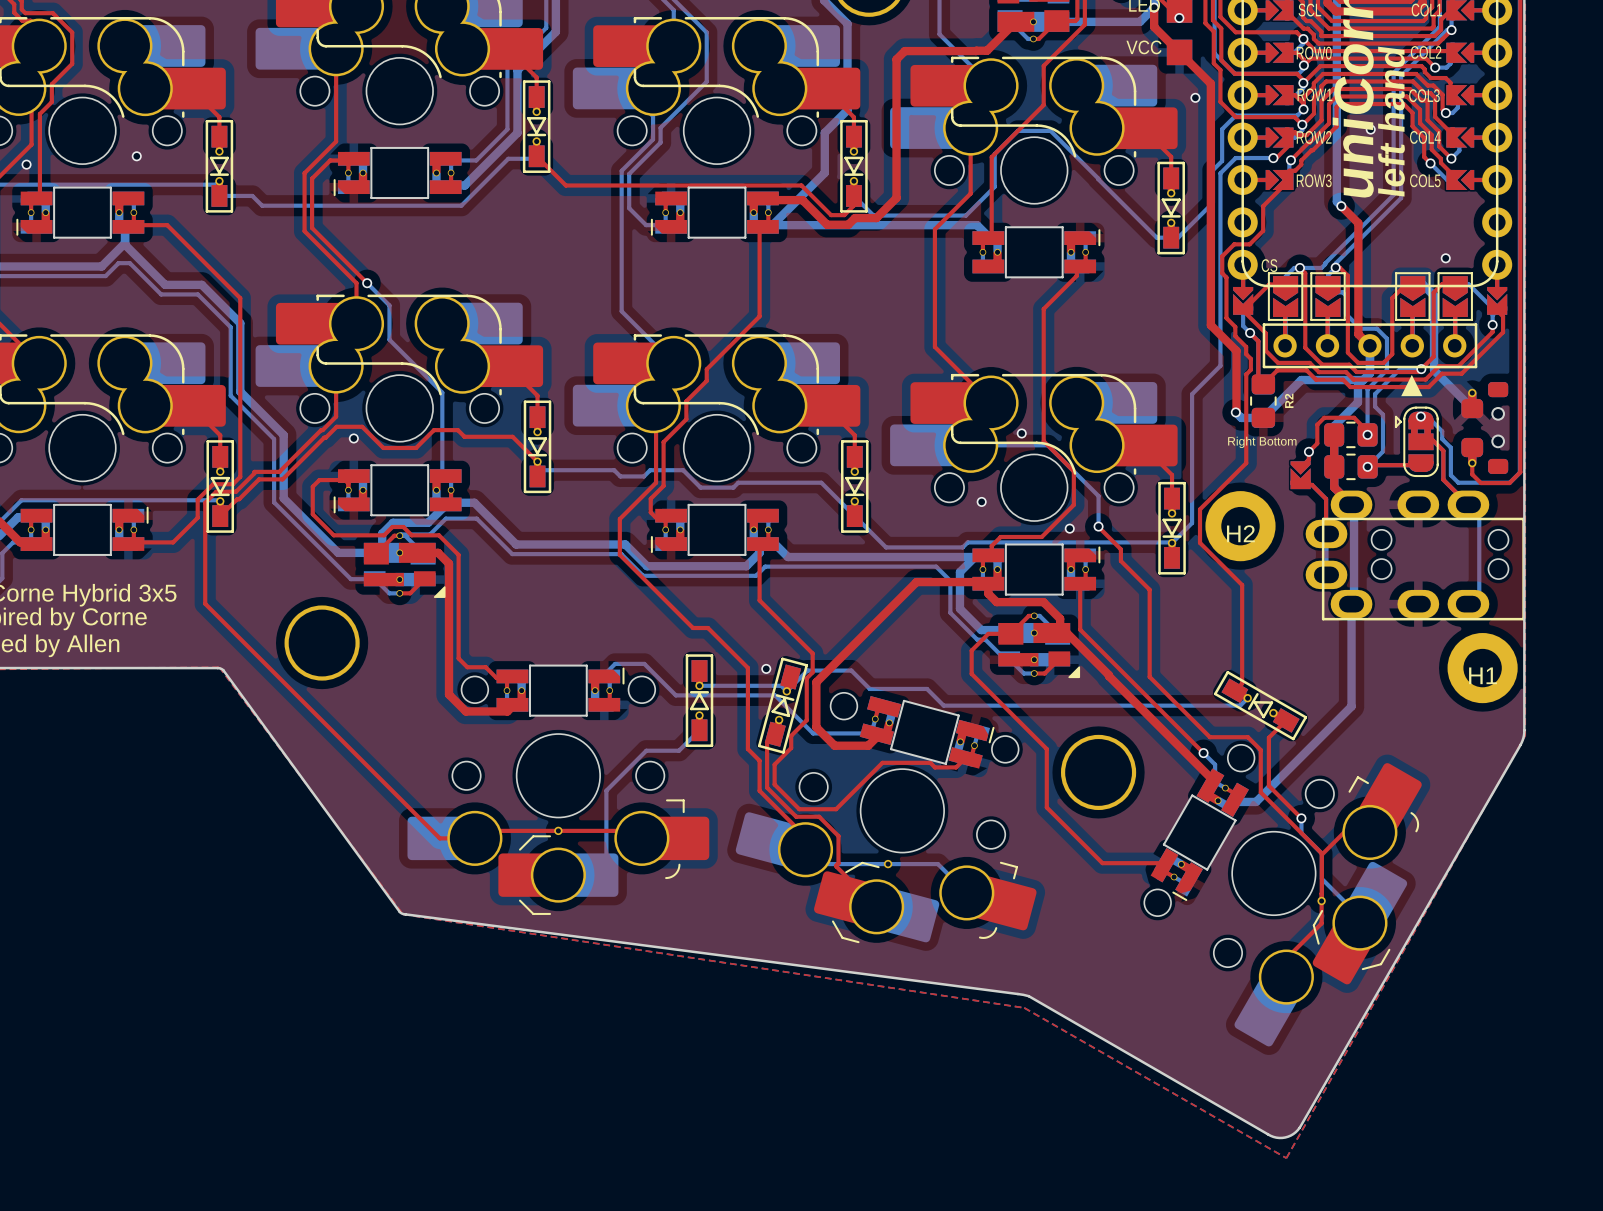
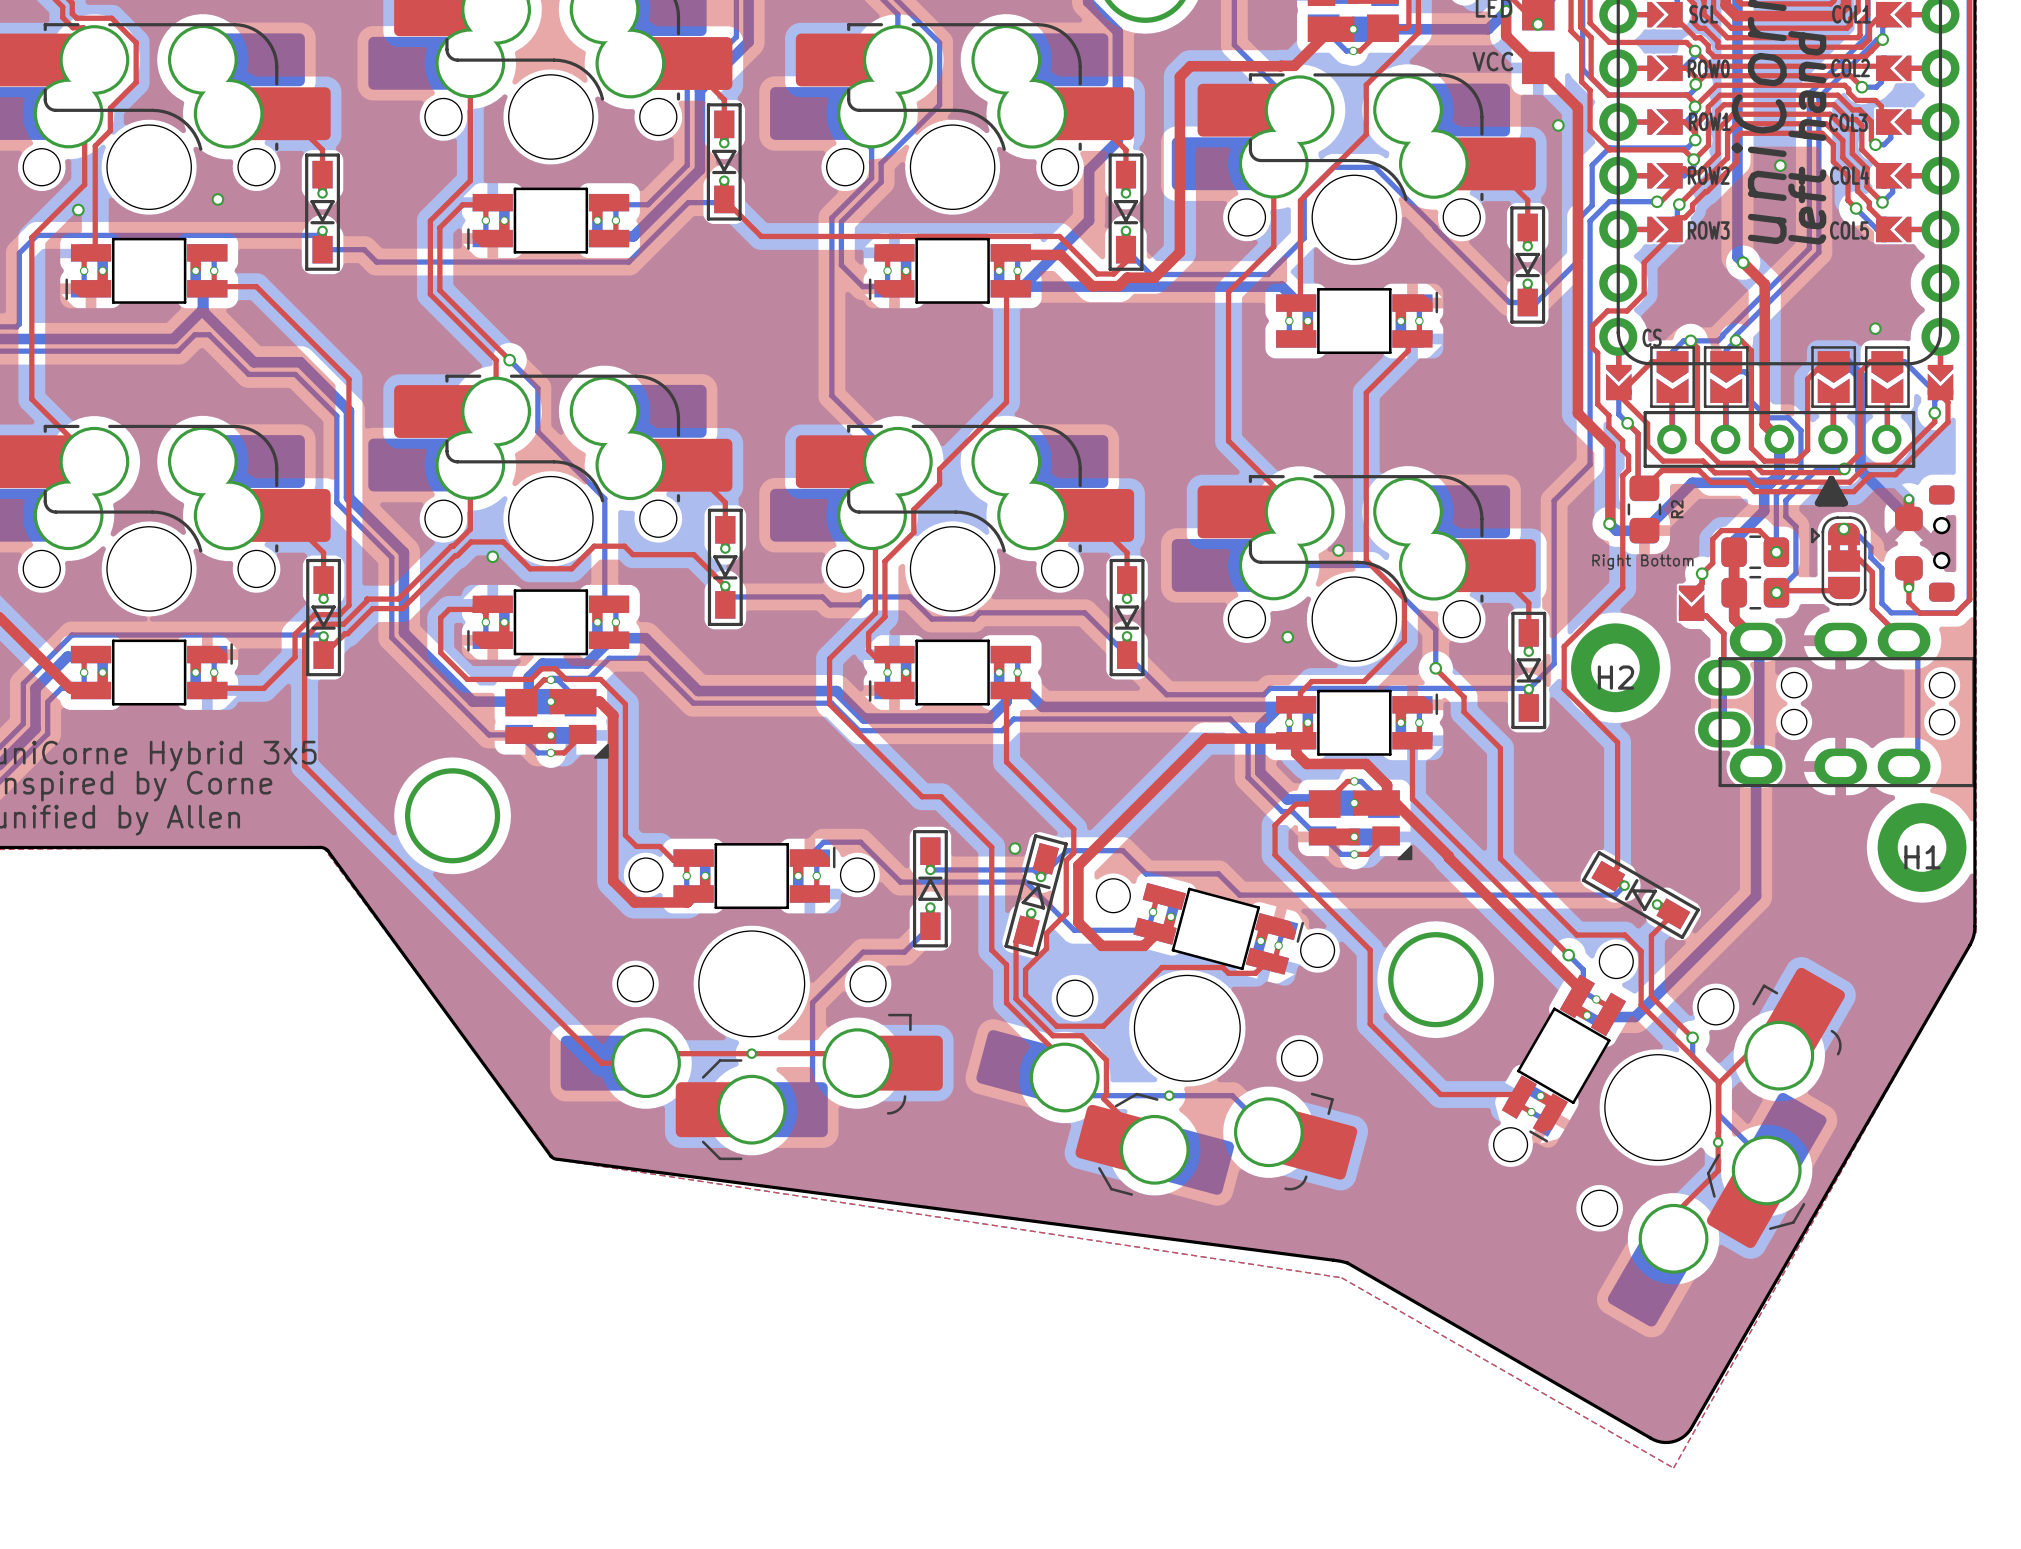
via: (1069, 528) -> none

